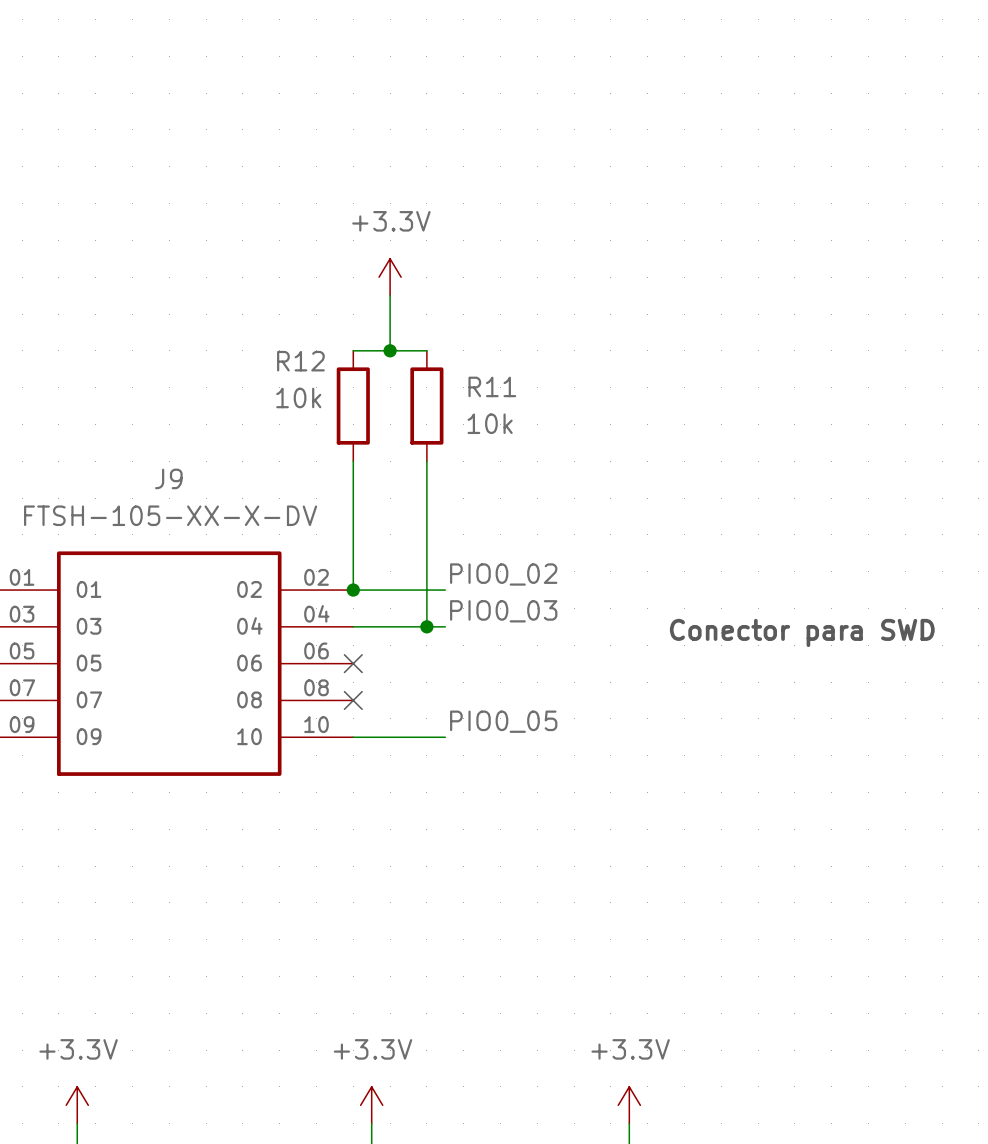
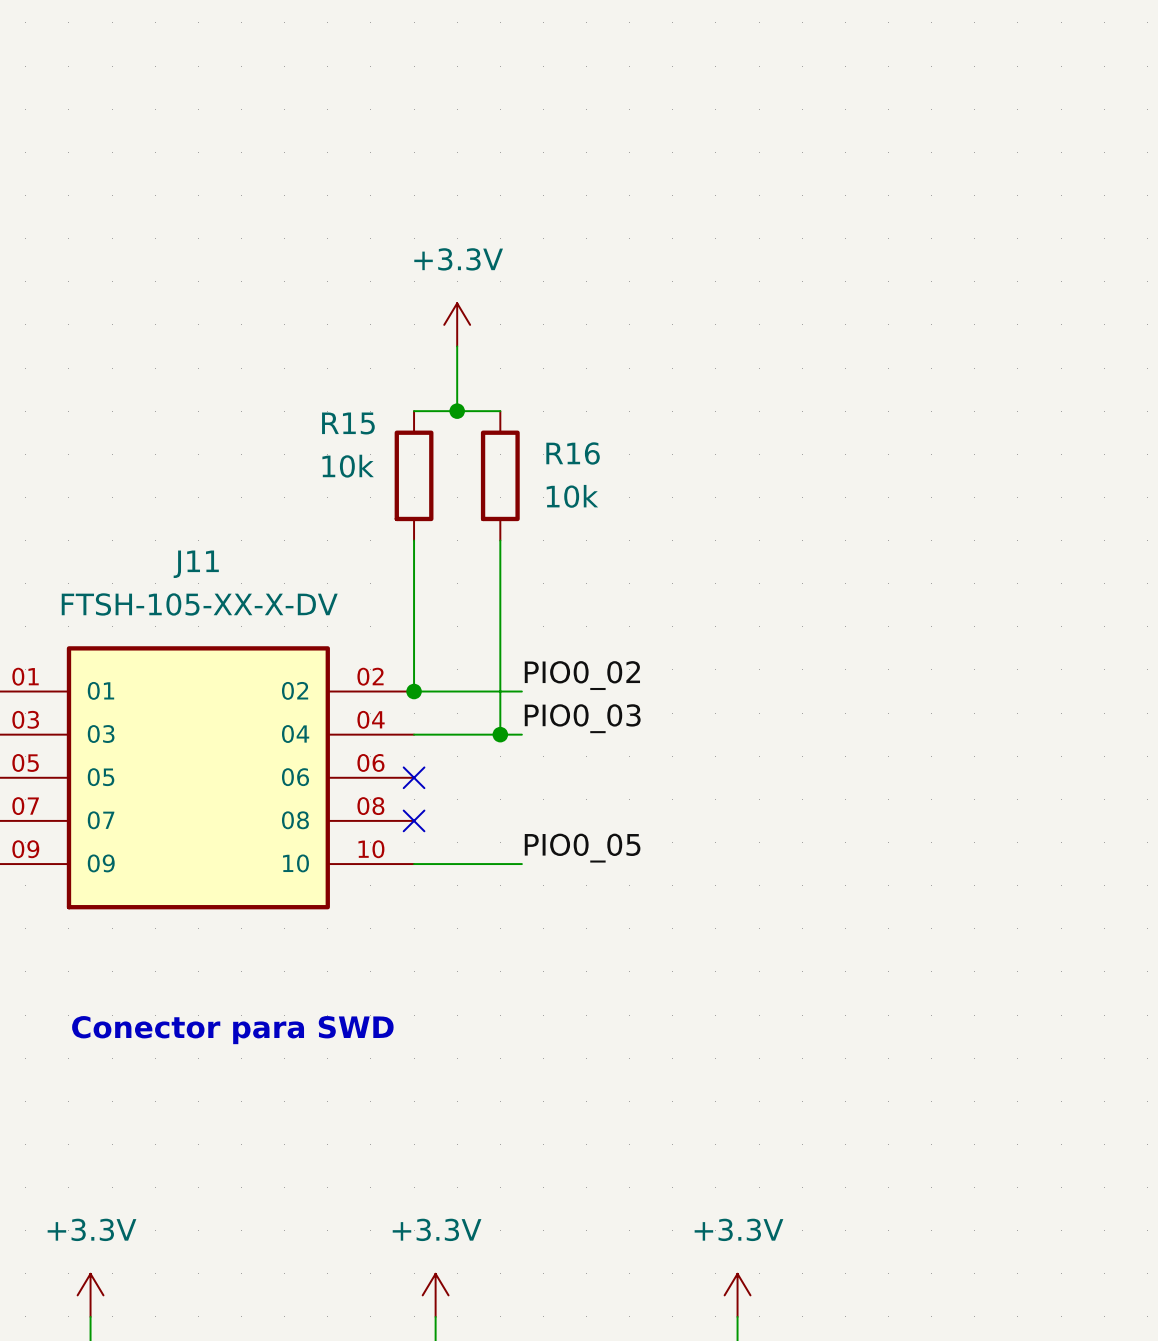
R12 name: R12 (300, 361) -> R15 (348, 423)
R11 name: R11 (492, 386) -> R16 (573, 453)
J9 name: J9 (168, 478) -> J11 (196, 564)
text: Conector para SWD (802, 632) -> none
text: none -> Conector para SWD (232, 1030)

